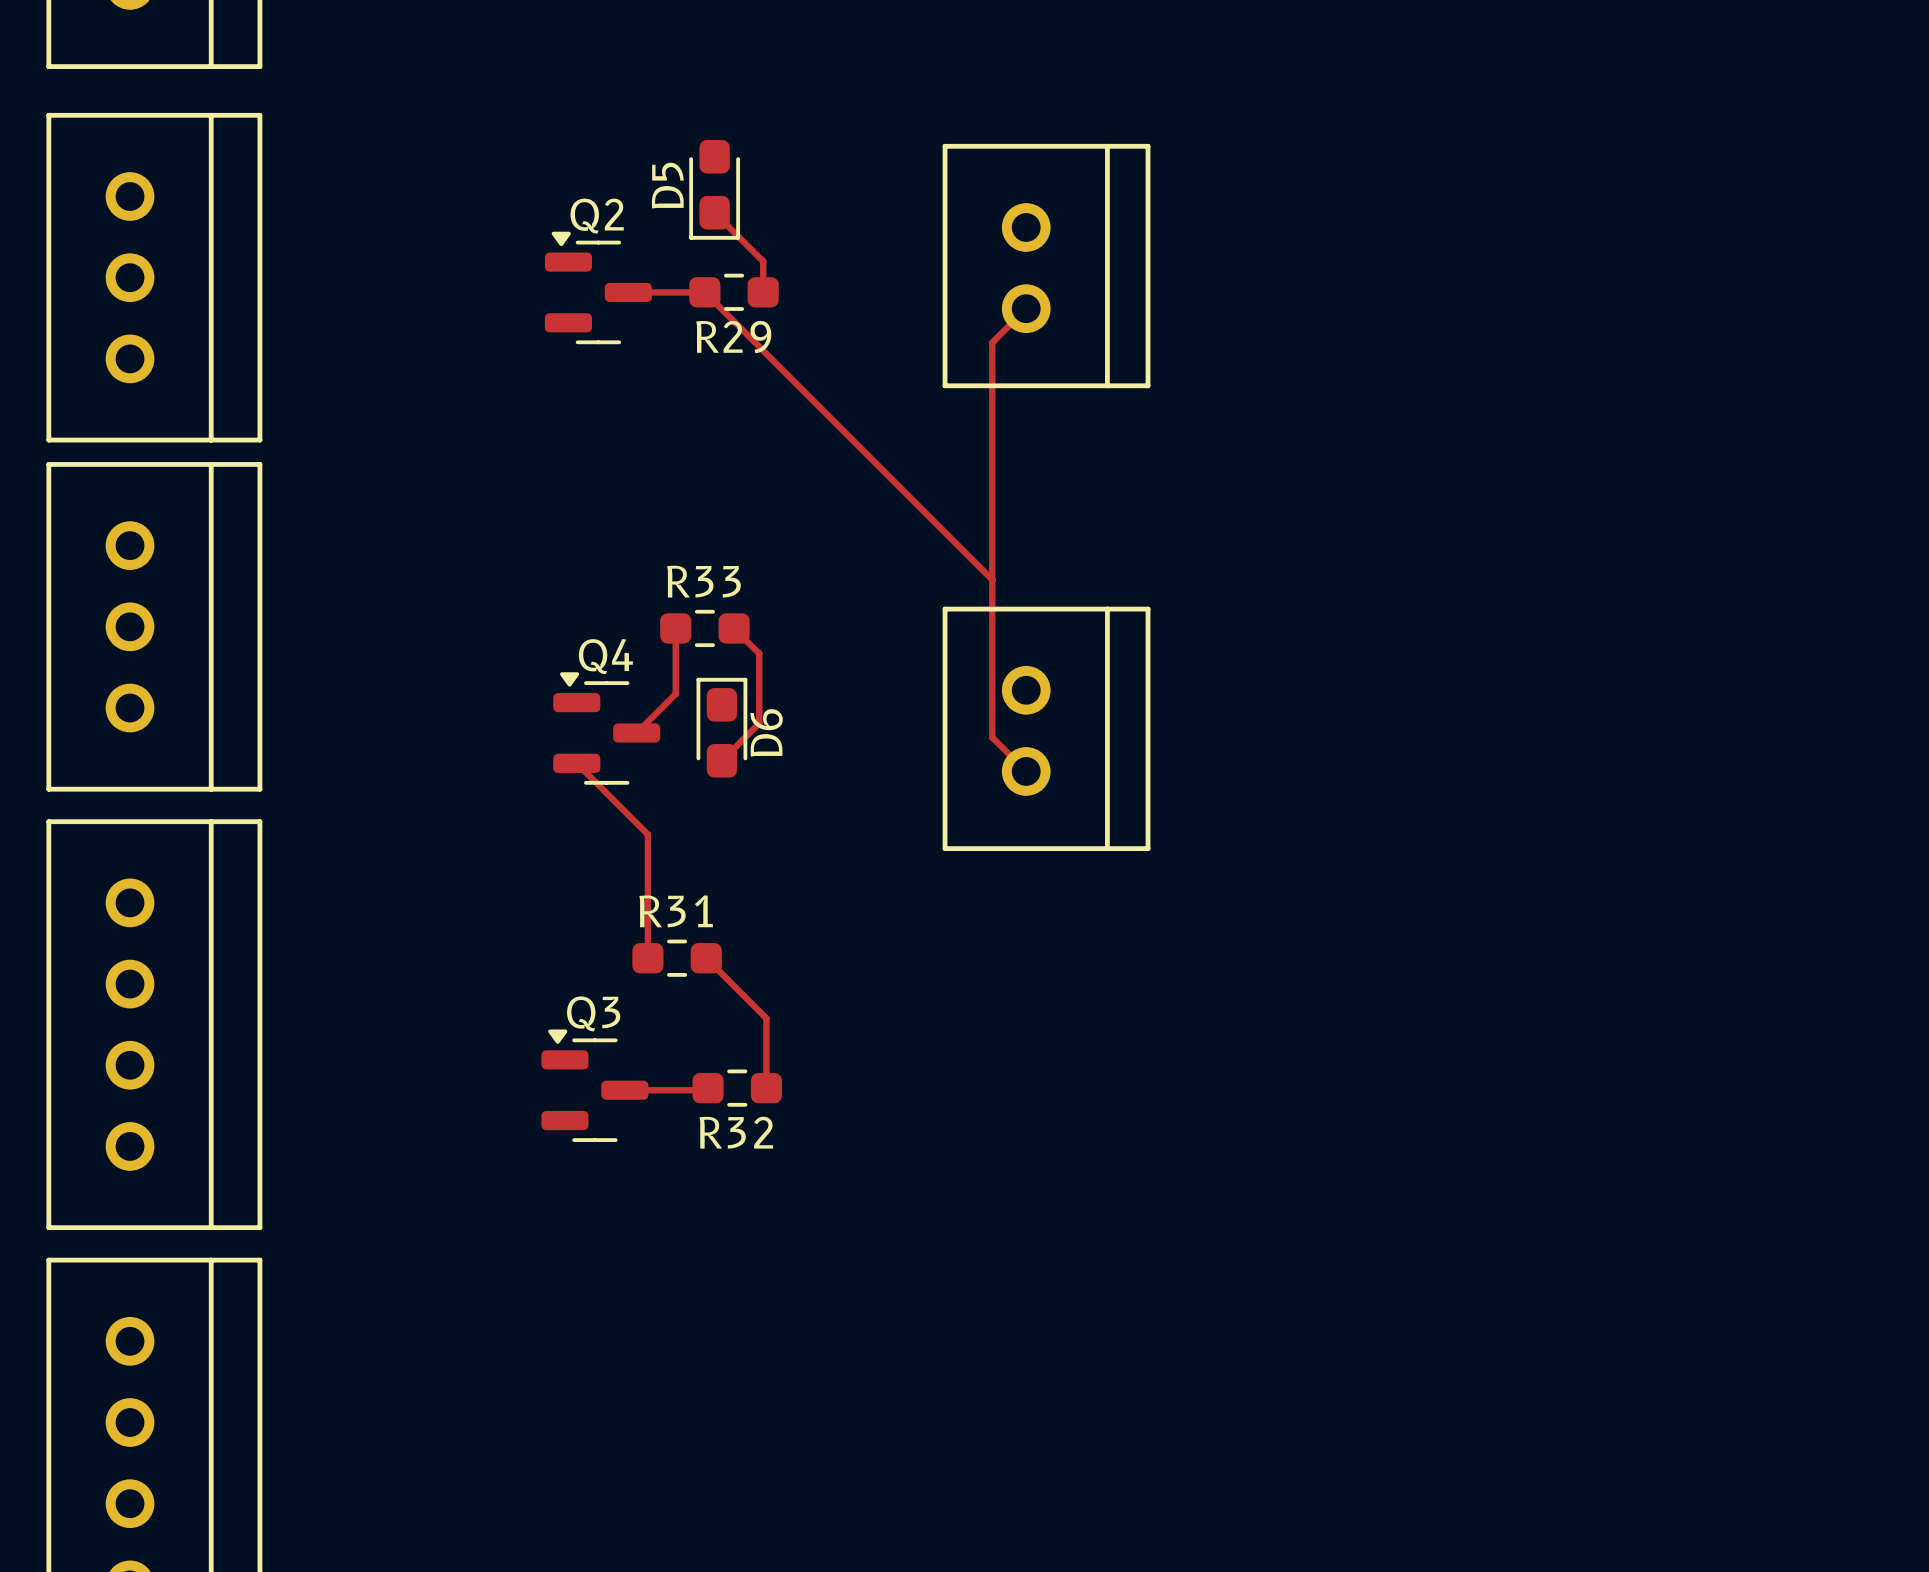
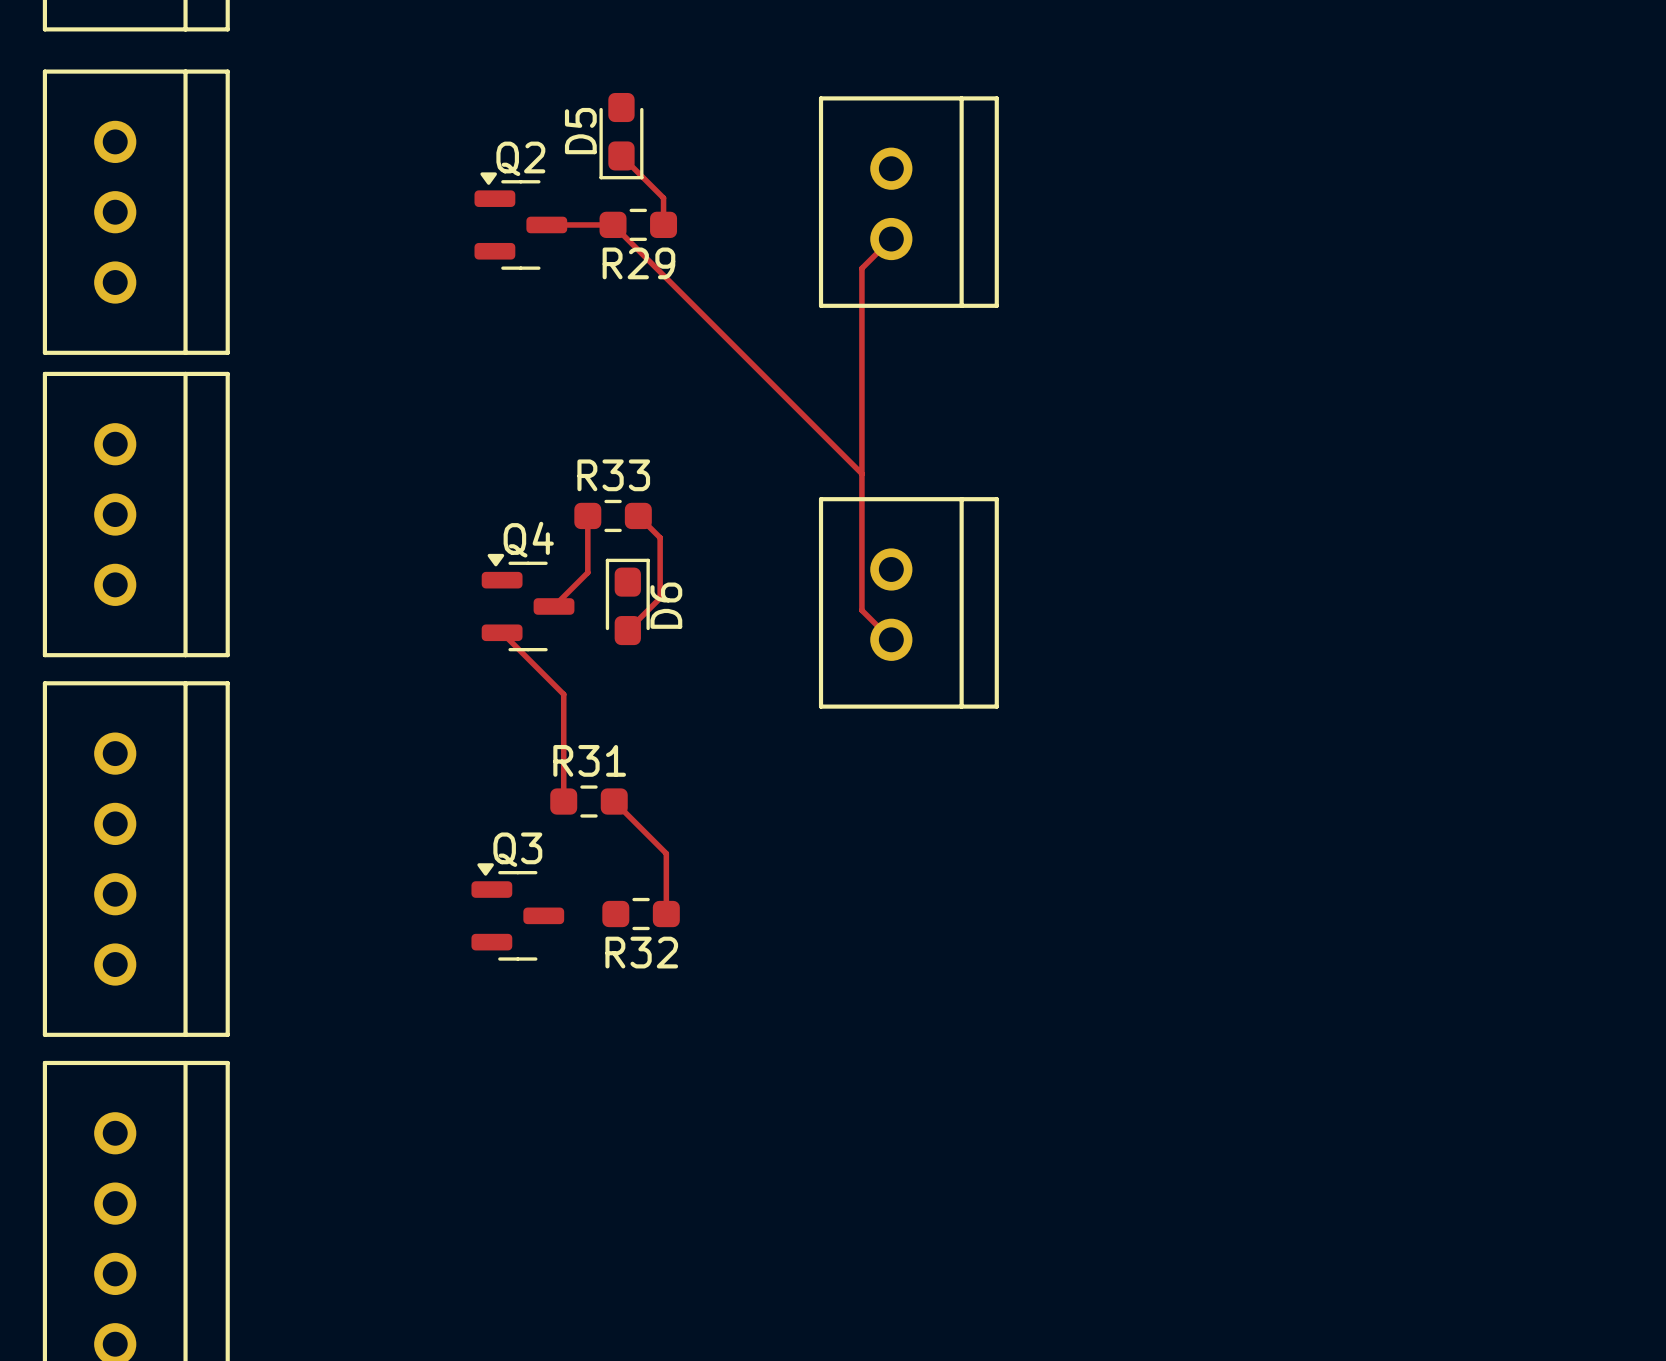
track: (624, 1090) (705, 1090) -> none

